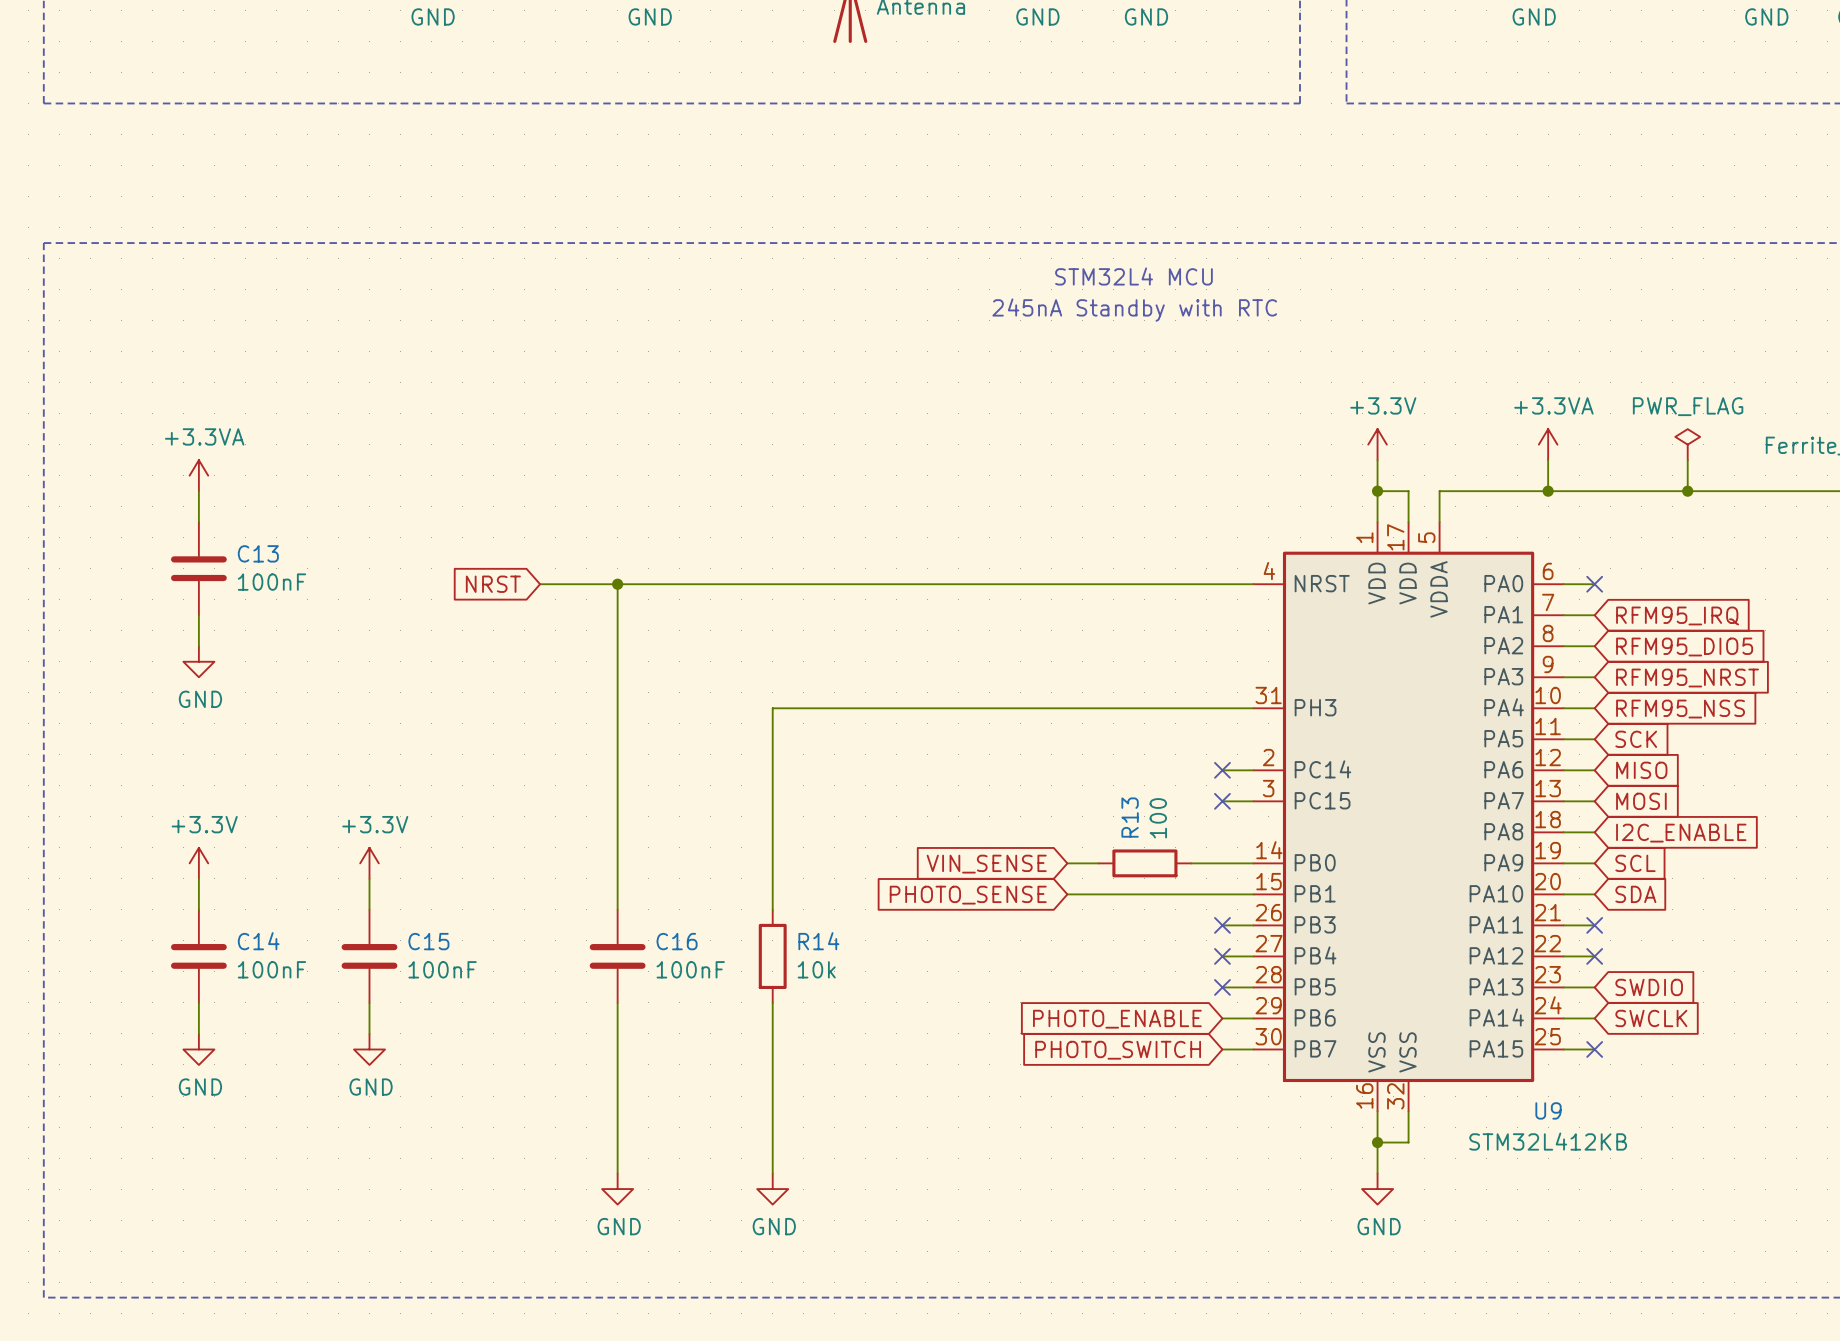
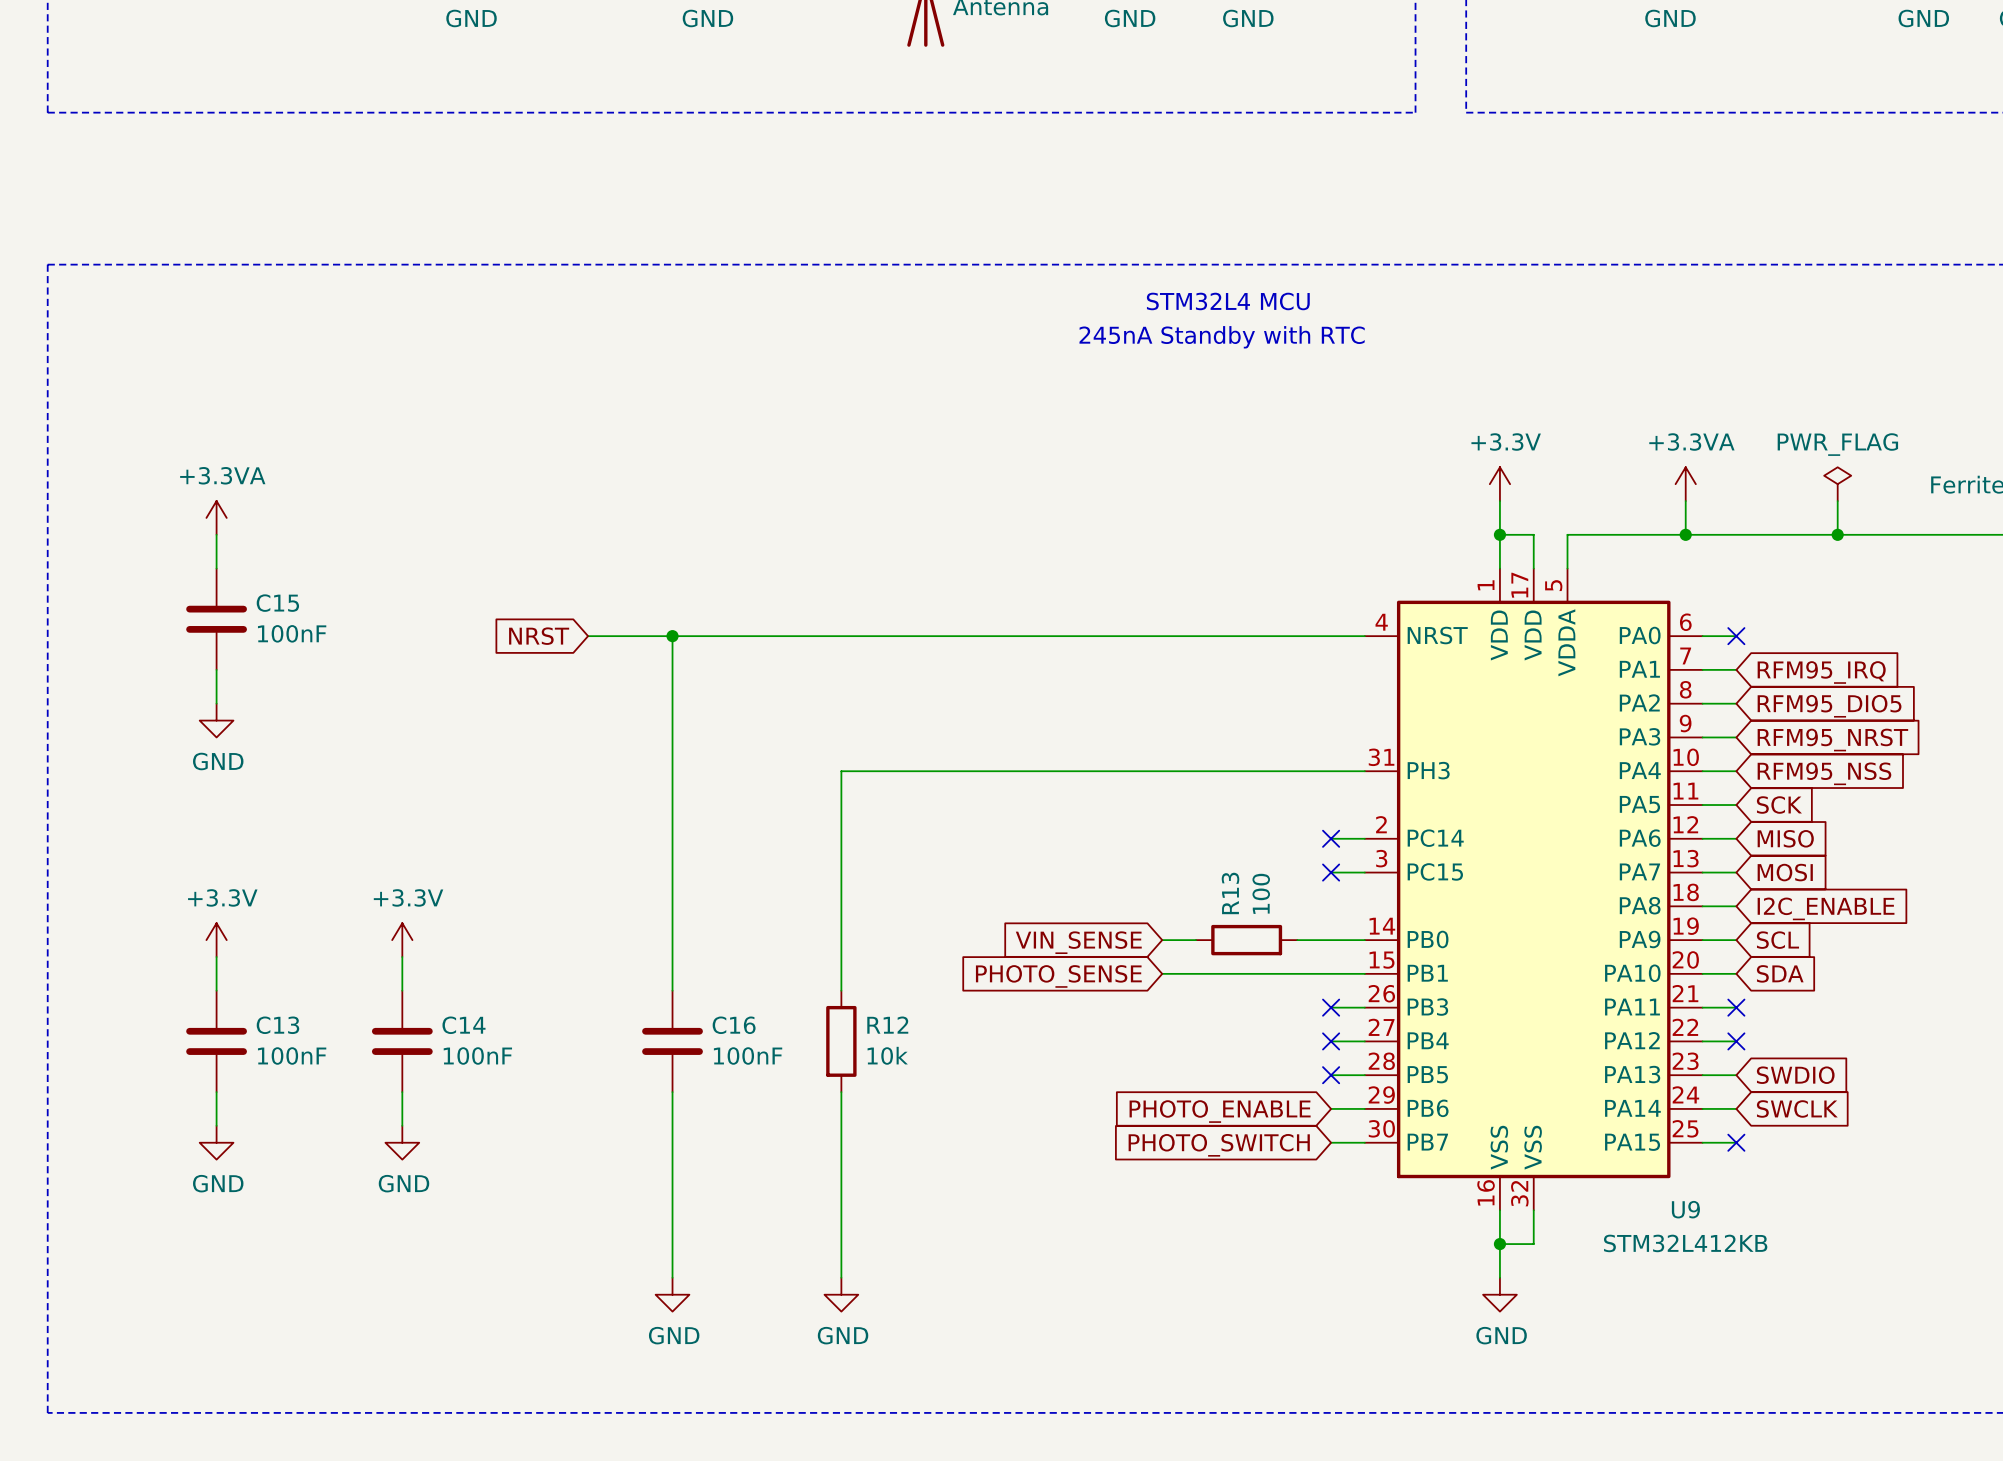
C13 name: C13 (258, 553) -> C15 (277, 603)
C14 name: C14 (258, 941) -> C13 (277, 1025)
C15 name: C15 (428, 941) -> C14 (463, 1025)
R14 name: R14 (818, 941) -> R12 (887, 1025)

